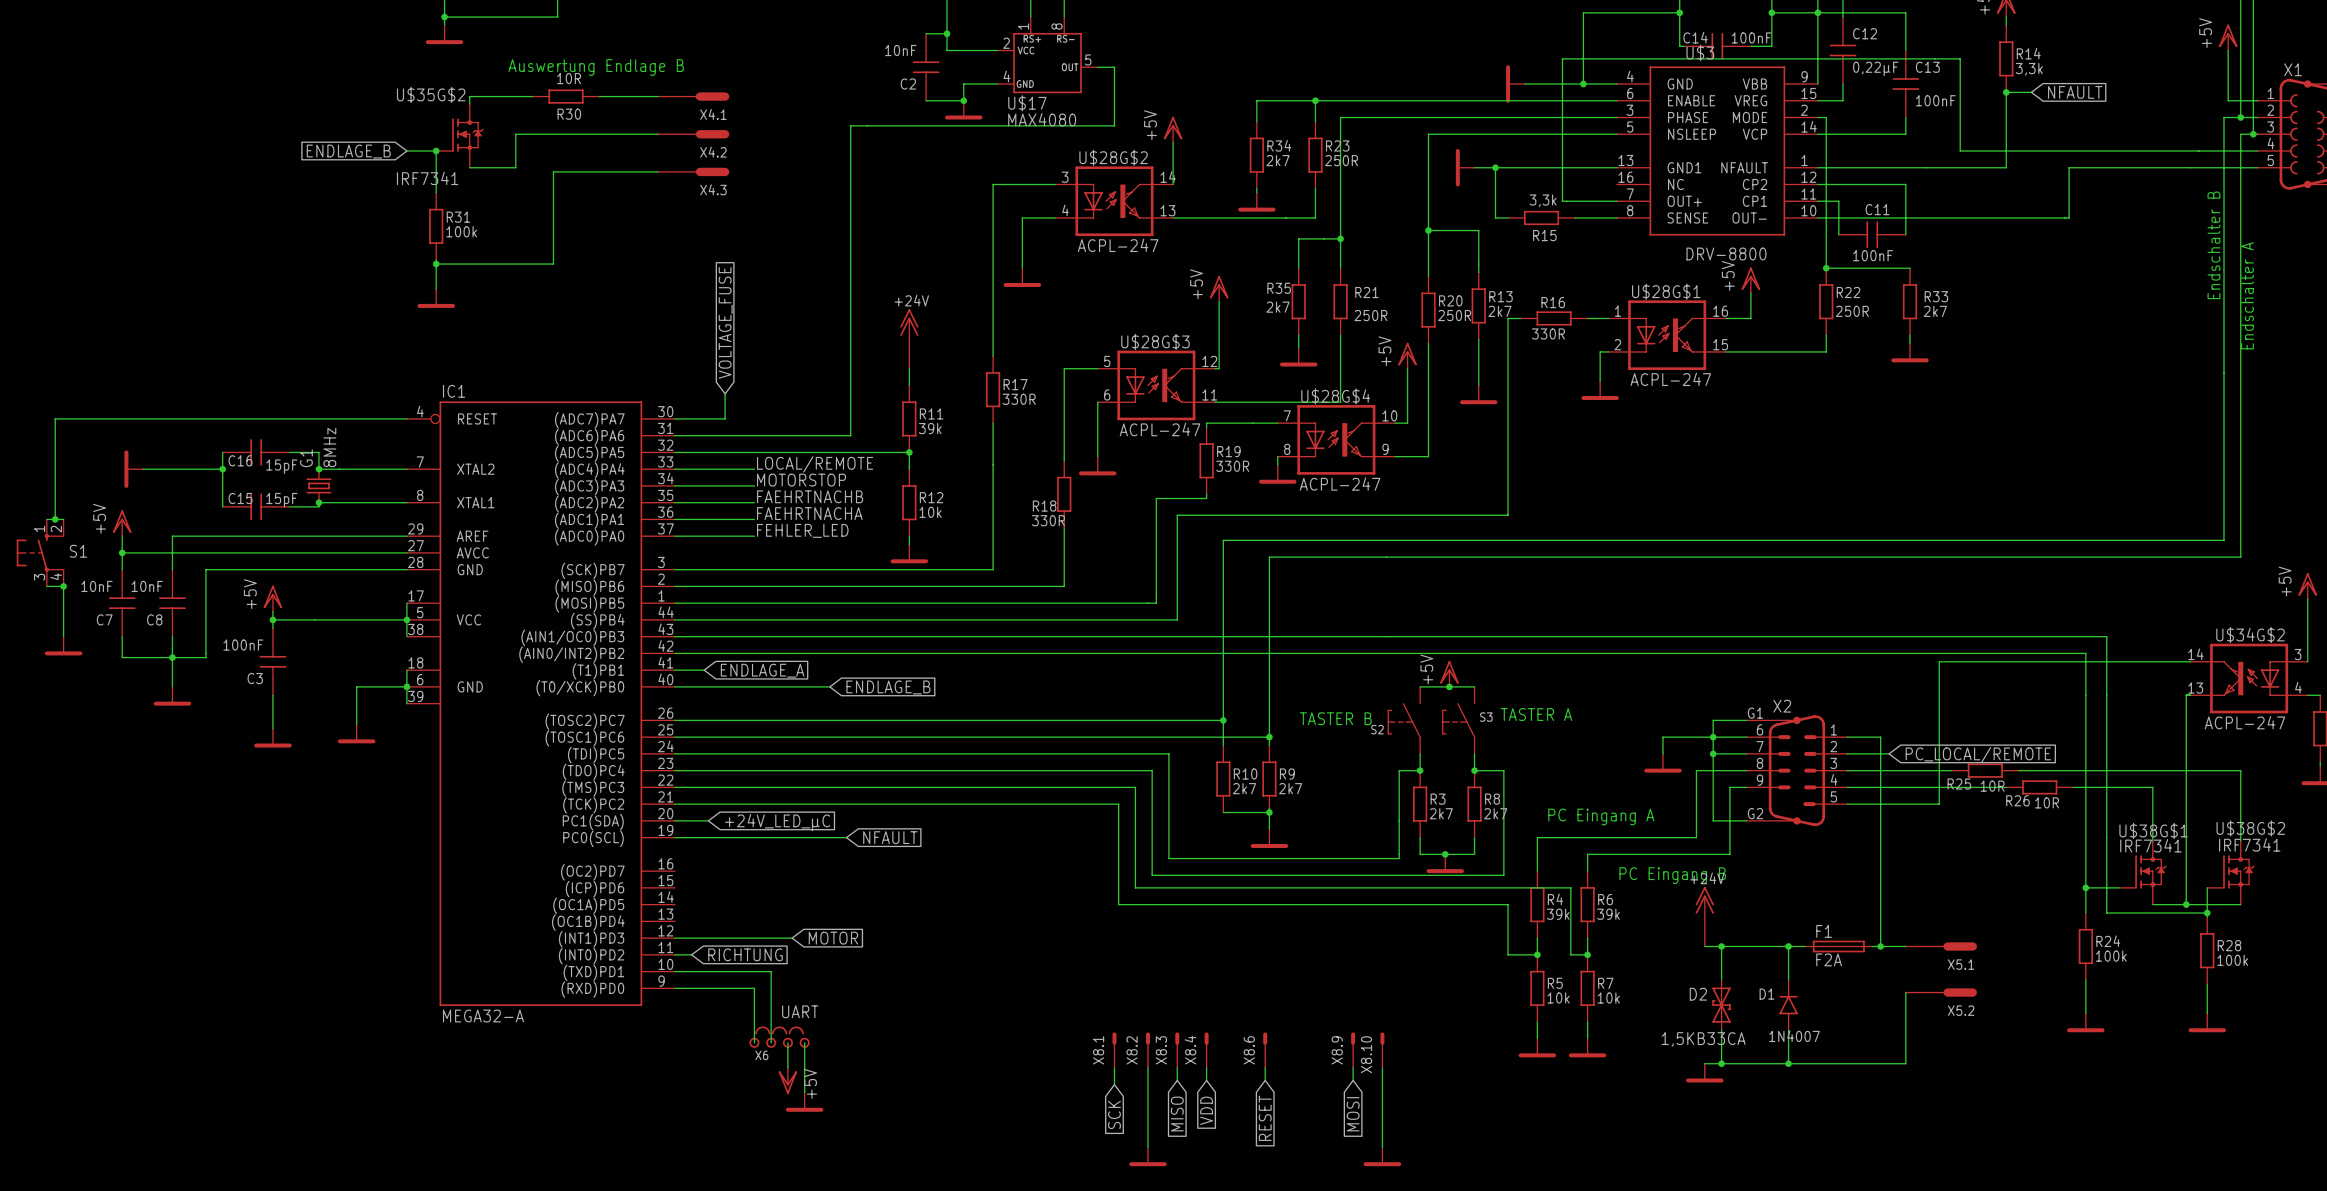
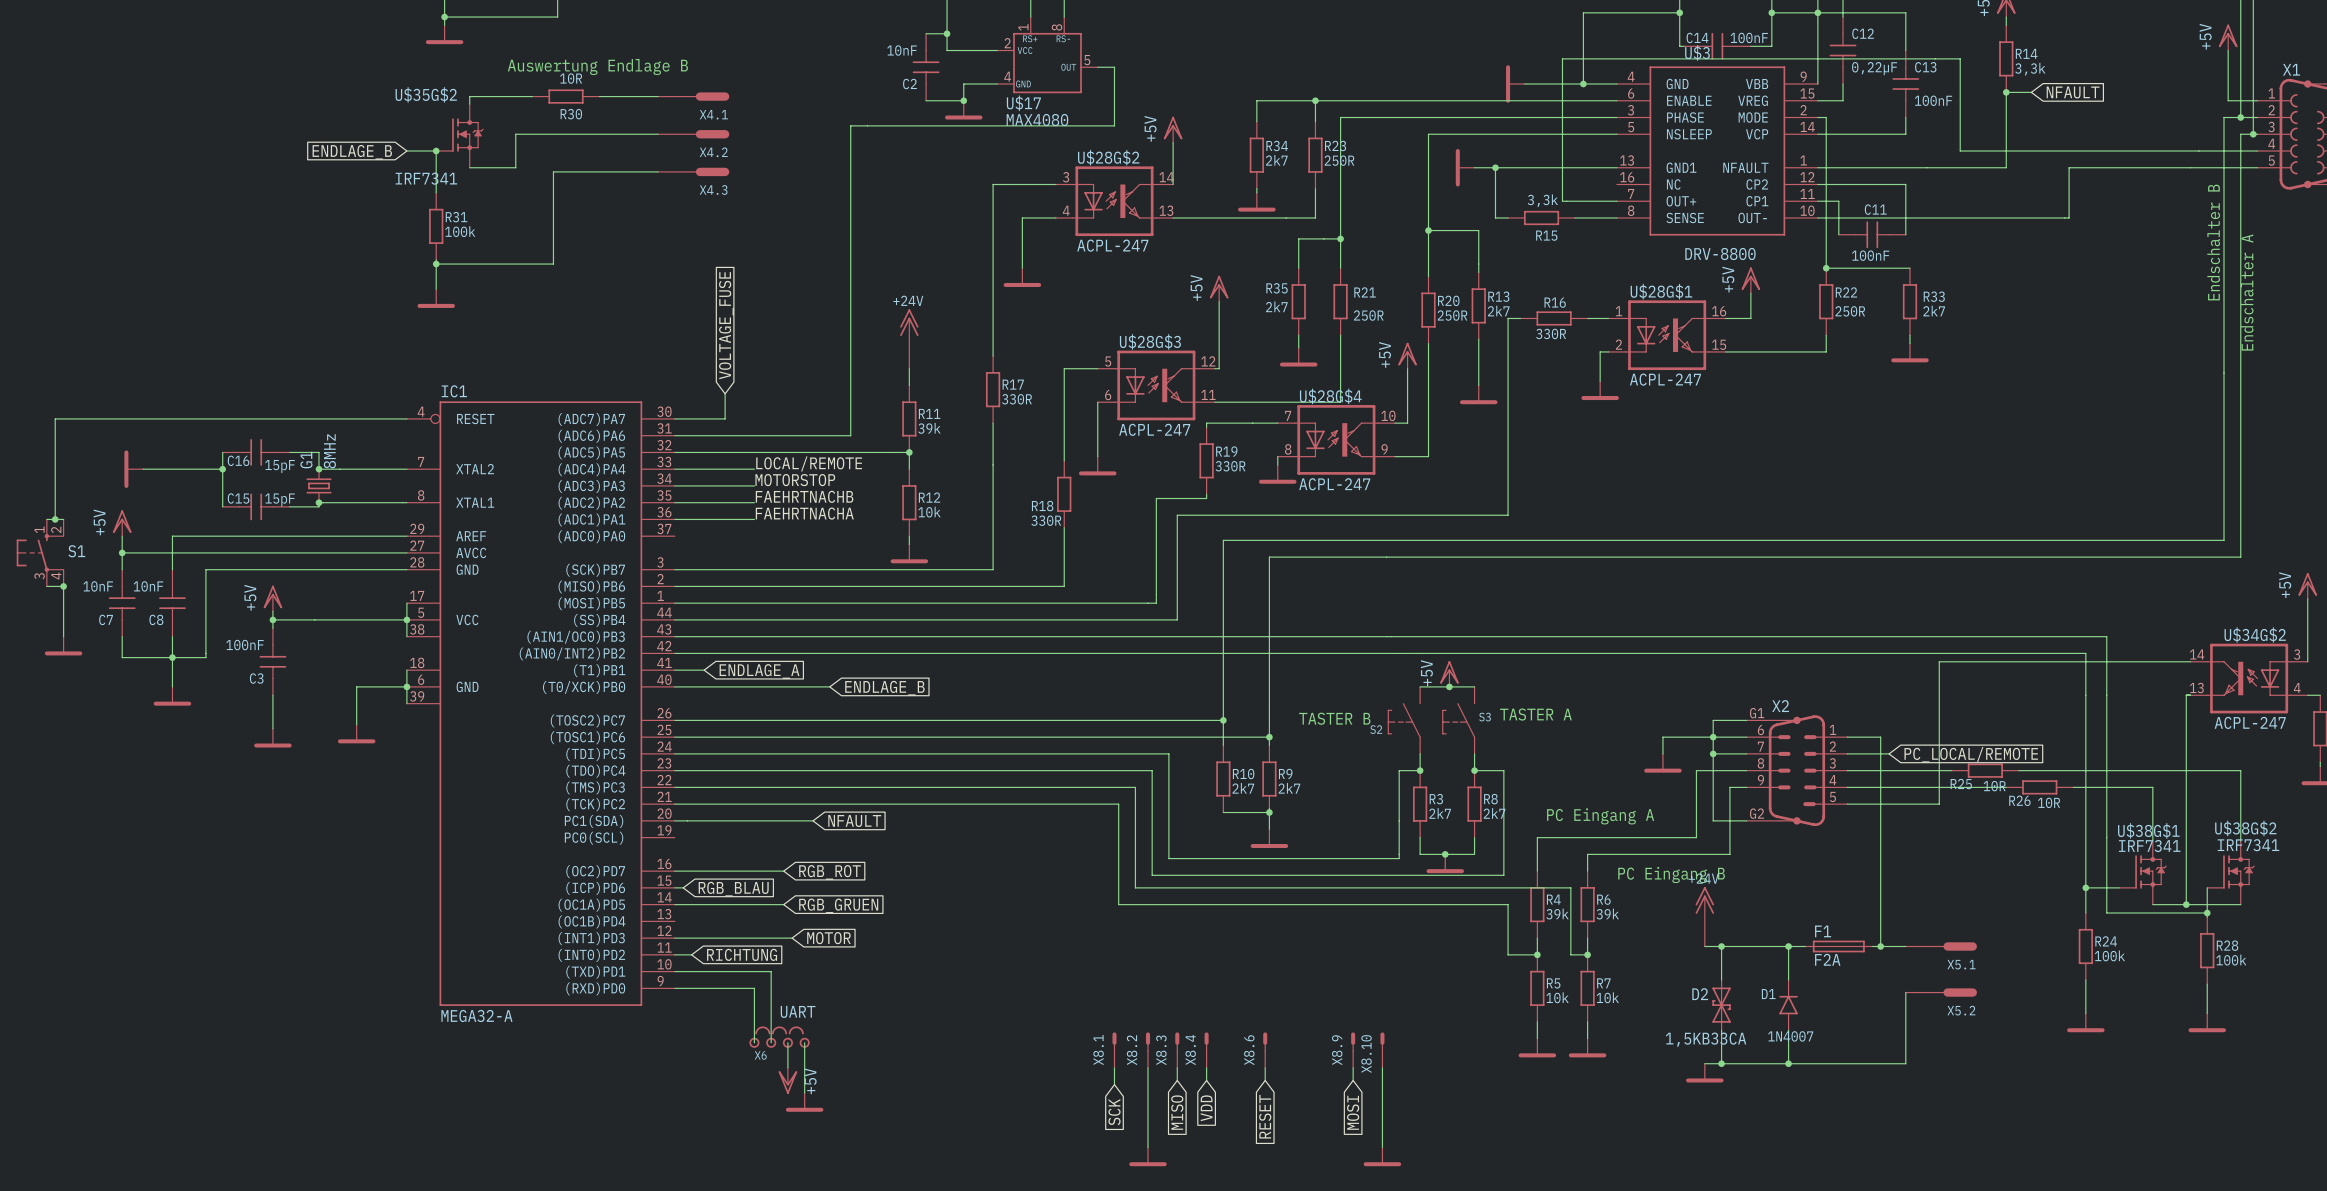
label: FEHLER_LED (802, 530) -> none
wire: (674, 536) (754, 536) -> none
wire: none -> (708, 820) (813, 820)
global label: +24V_LED_µC (777, 822) -> none
wire: (674, 837) (846, 837) -> none
global label position: NFAULT (890, 837) -> NFAULT (854, 820)
wire: none -> (674, 871) (783, 871)
global label: none -> RGB_ROT (830, 872)
wire: none -> (674, 887) (683, 887)
global label: none -> RGB_BLAU (733, 889)
wire: none -> (674, 904) (783, 904)
global label: none -> RGB_GRUEN (838, 905)

